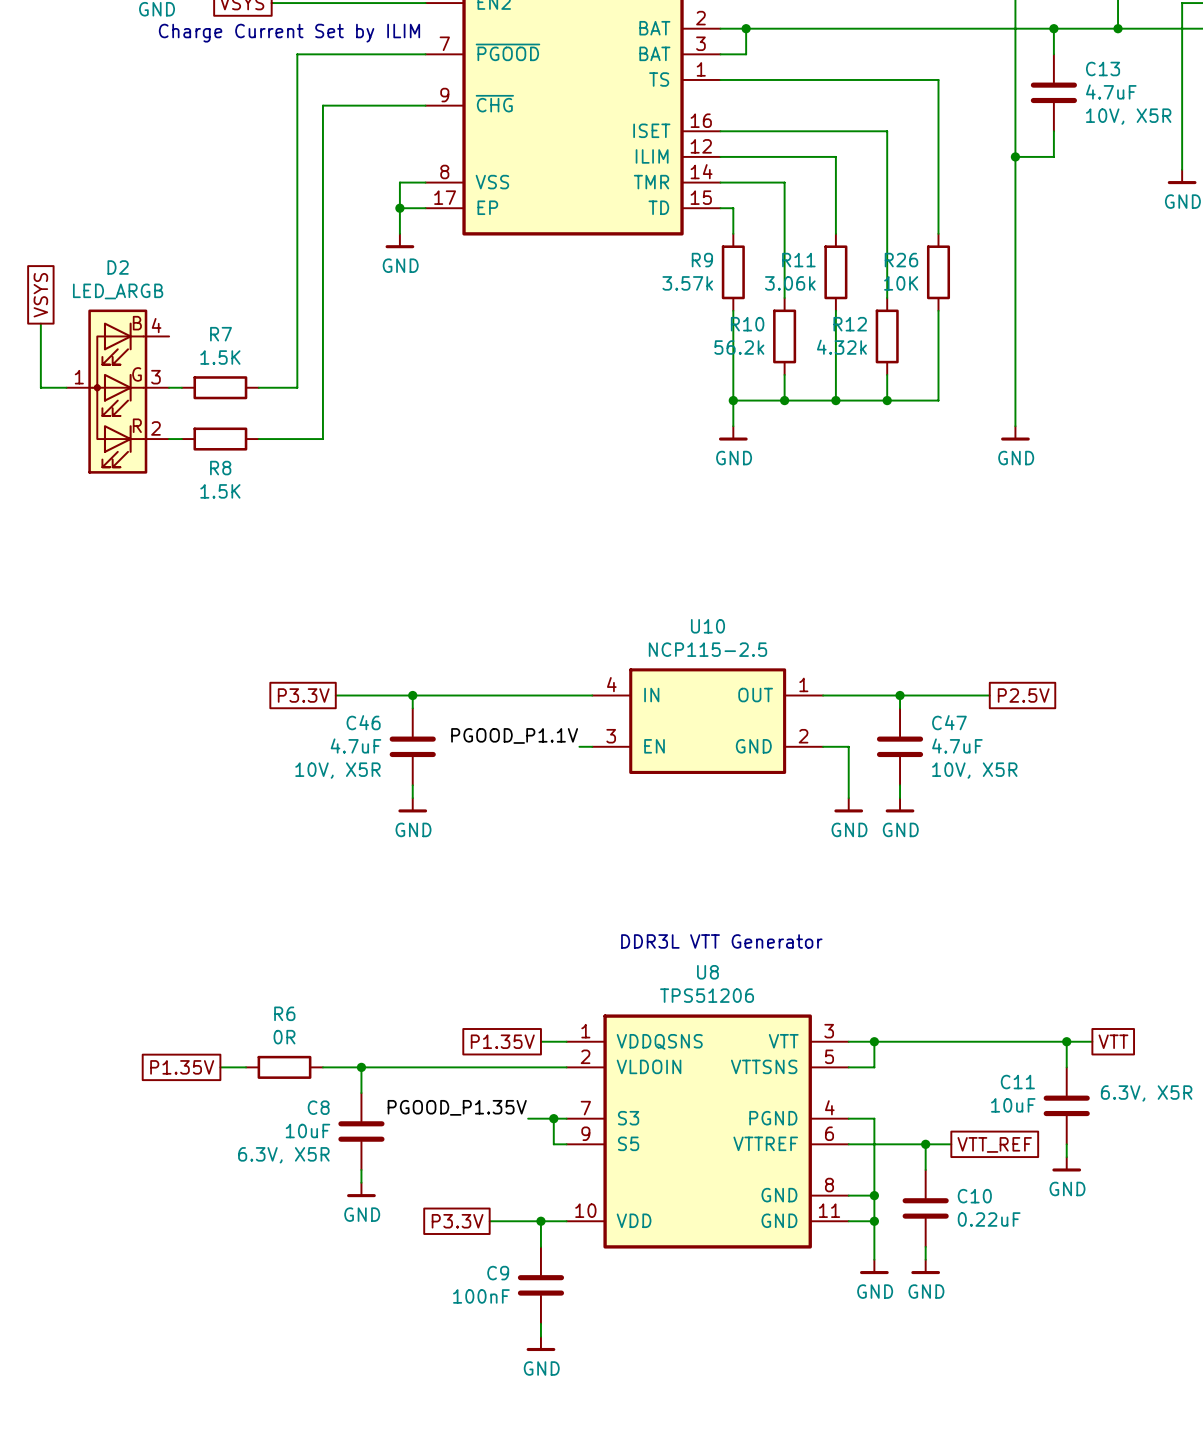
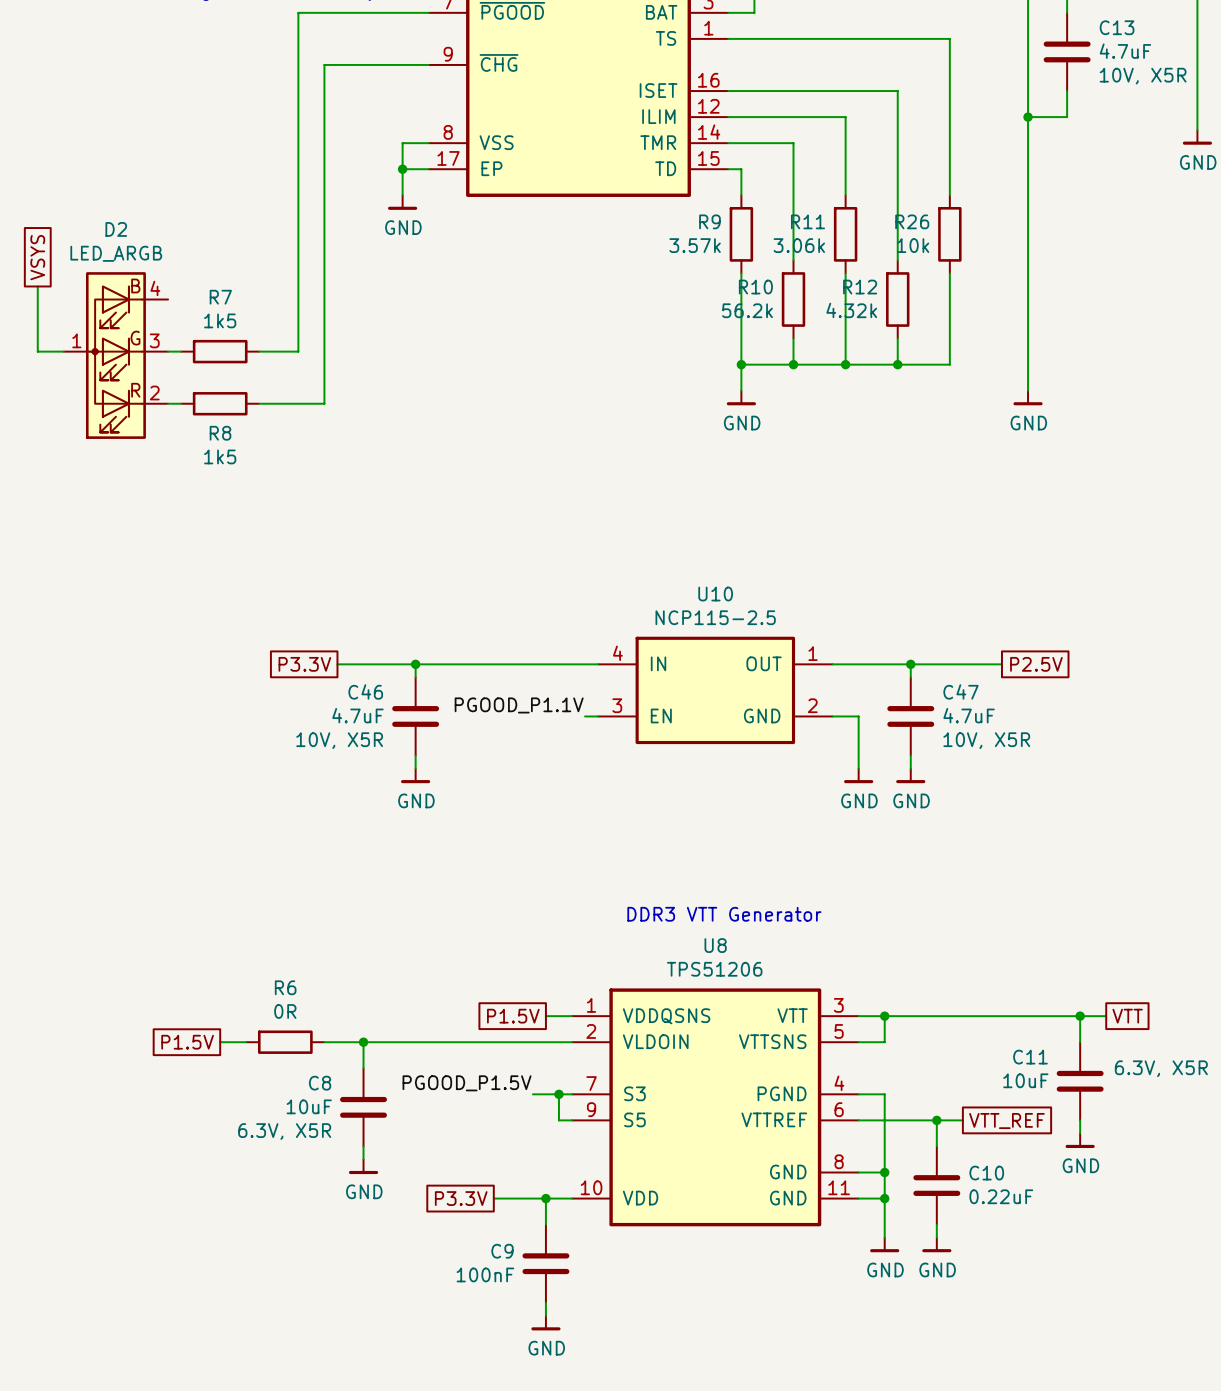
R26 value: 10K (901, 283) -> 10k (913, 245)
R7 value: 1.5K (220, 357) -> 1k5 (220, 320)
R8 value: 1.5K (220, 491) -> 1k5 (220, 456)
text: DDR3L VTT Generator (721, 941) -> DDR3 VTT Generator (724, 914)
global label: P1.35V (502, 1041) -> P1.5V (513, 1016)
global label: P1.35V (182, 1067) -> P1.5V (187, 1042)
label: PGOOD_P1.35V (457, 1107) -> PGOOD_P1.5V (467, 1083)

